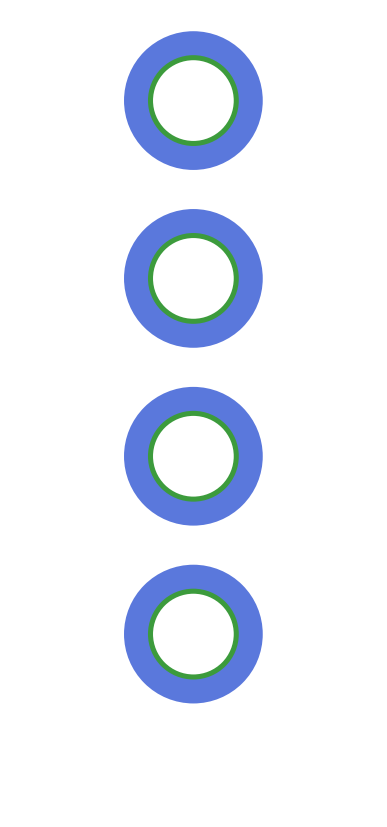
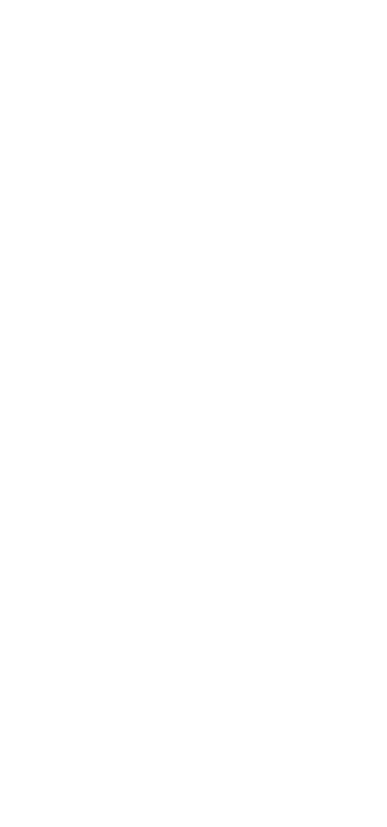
part: (193, 100) -> none
part: (193, 278) -> none
part: (193, 456) -> none
part: (193, 634) -> none

